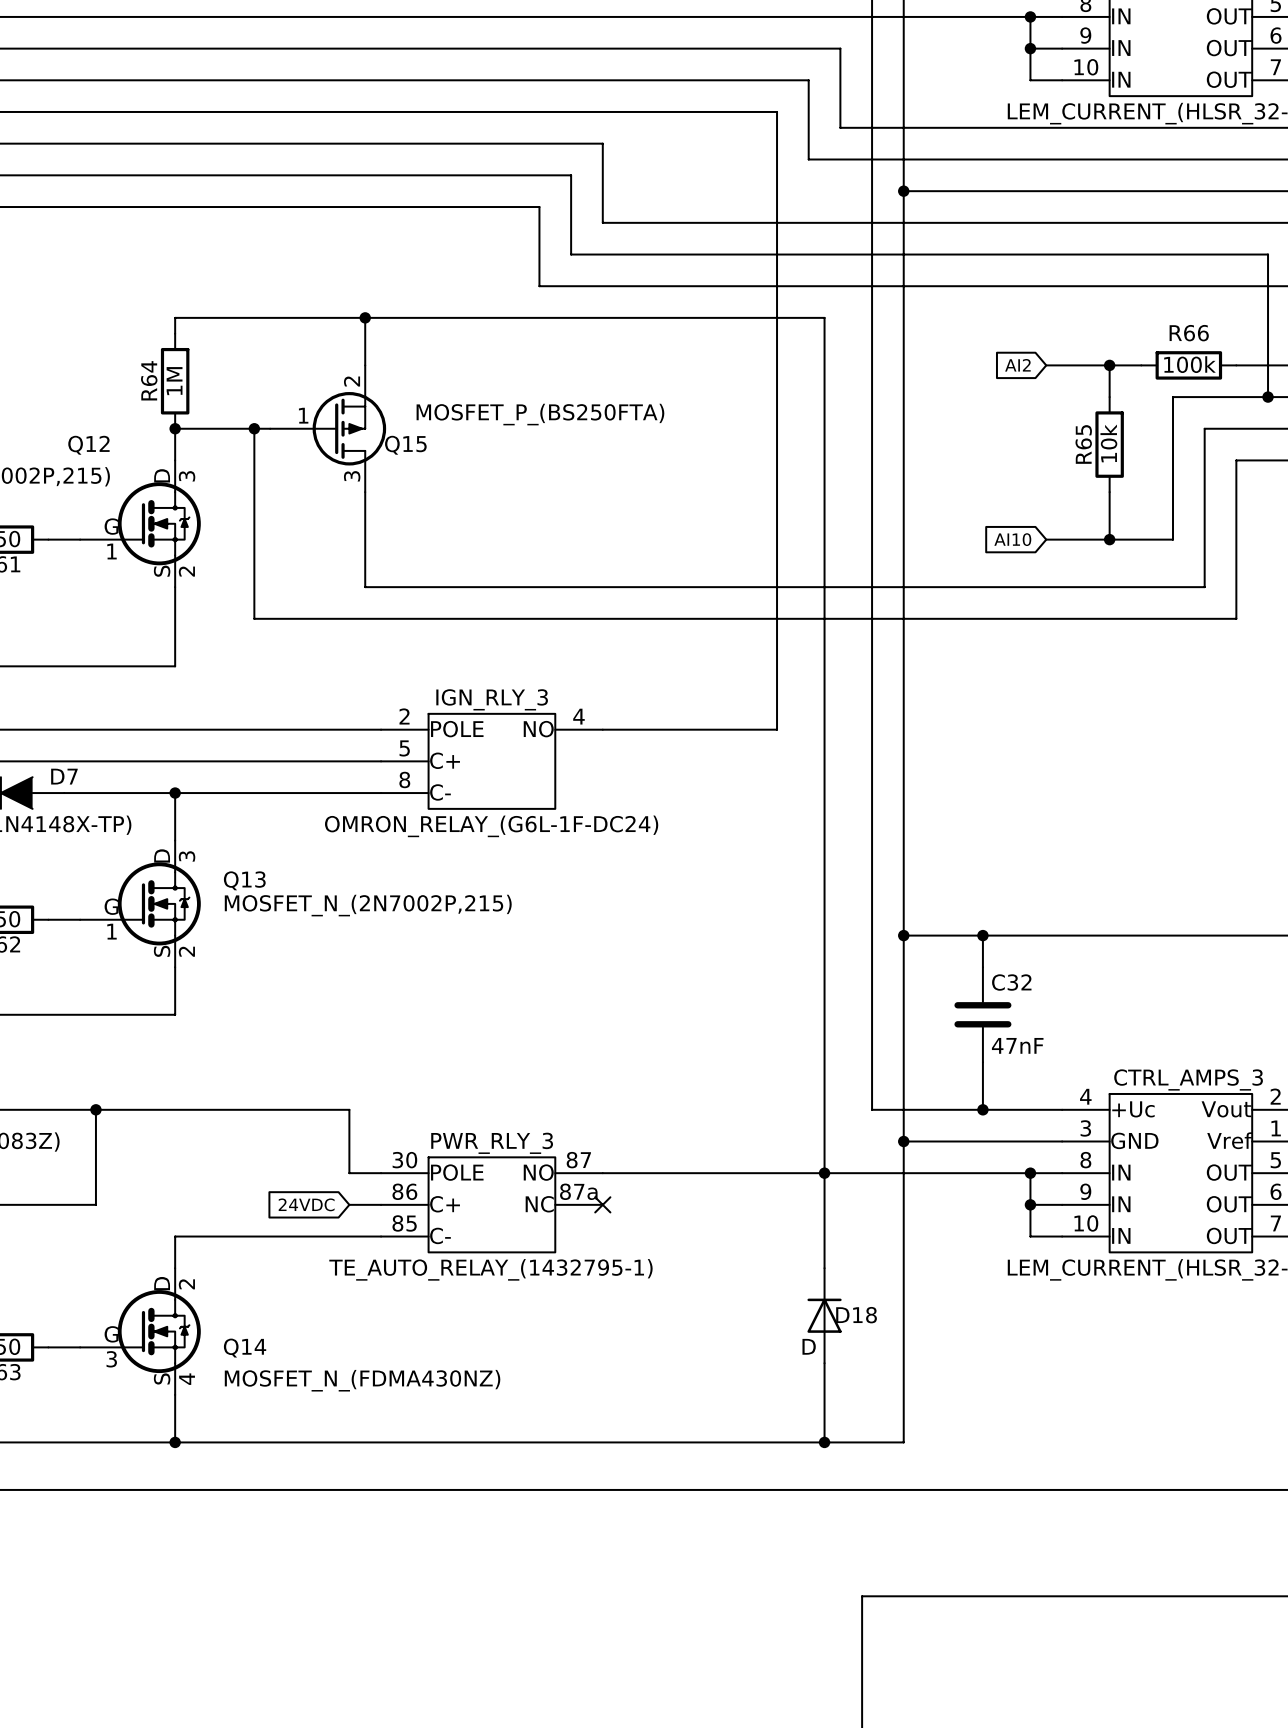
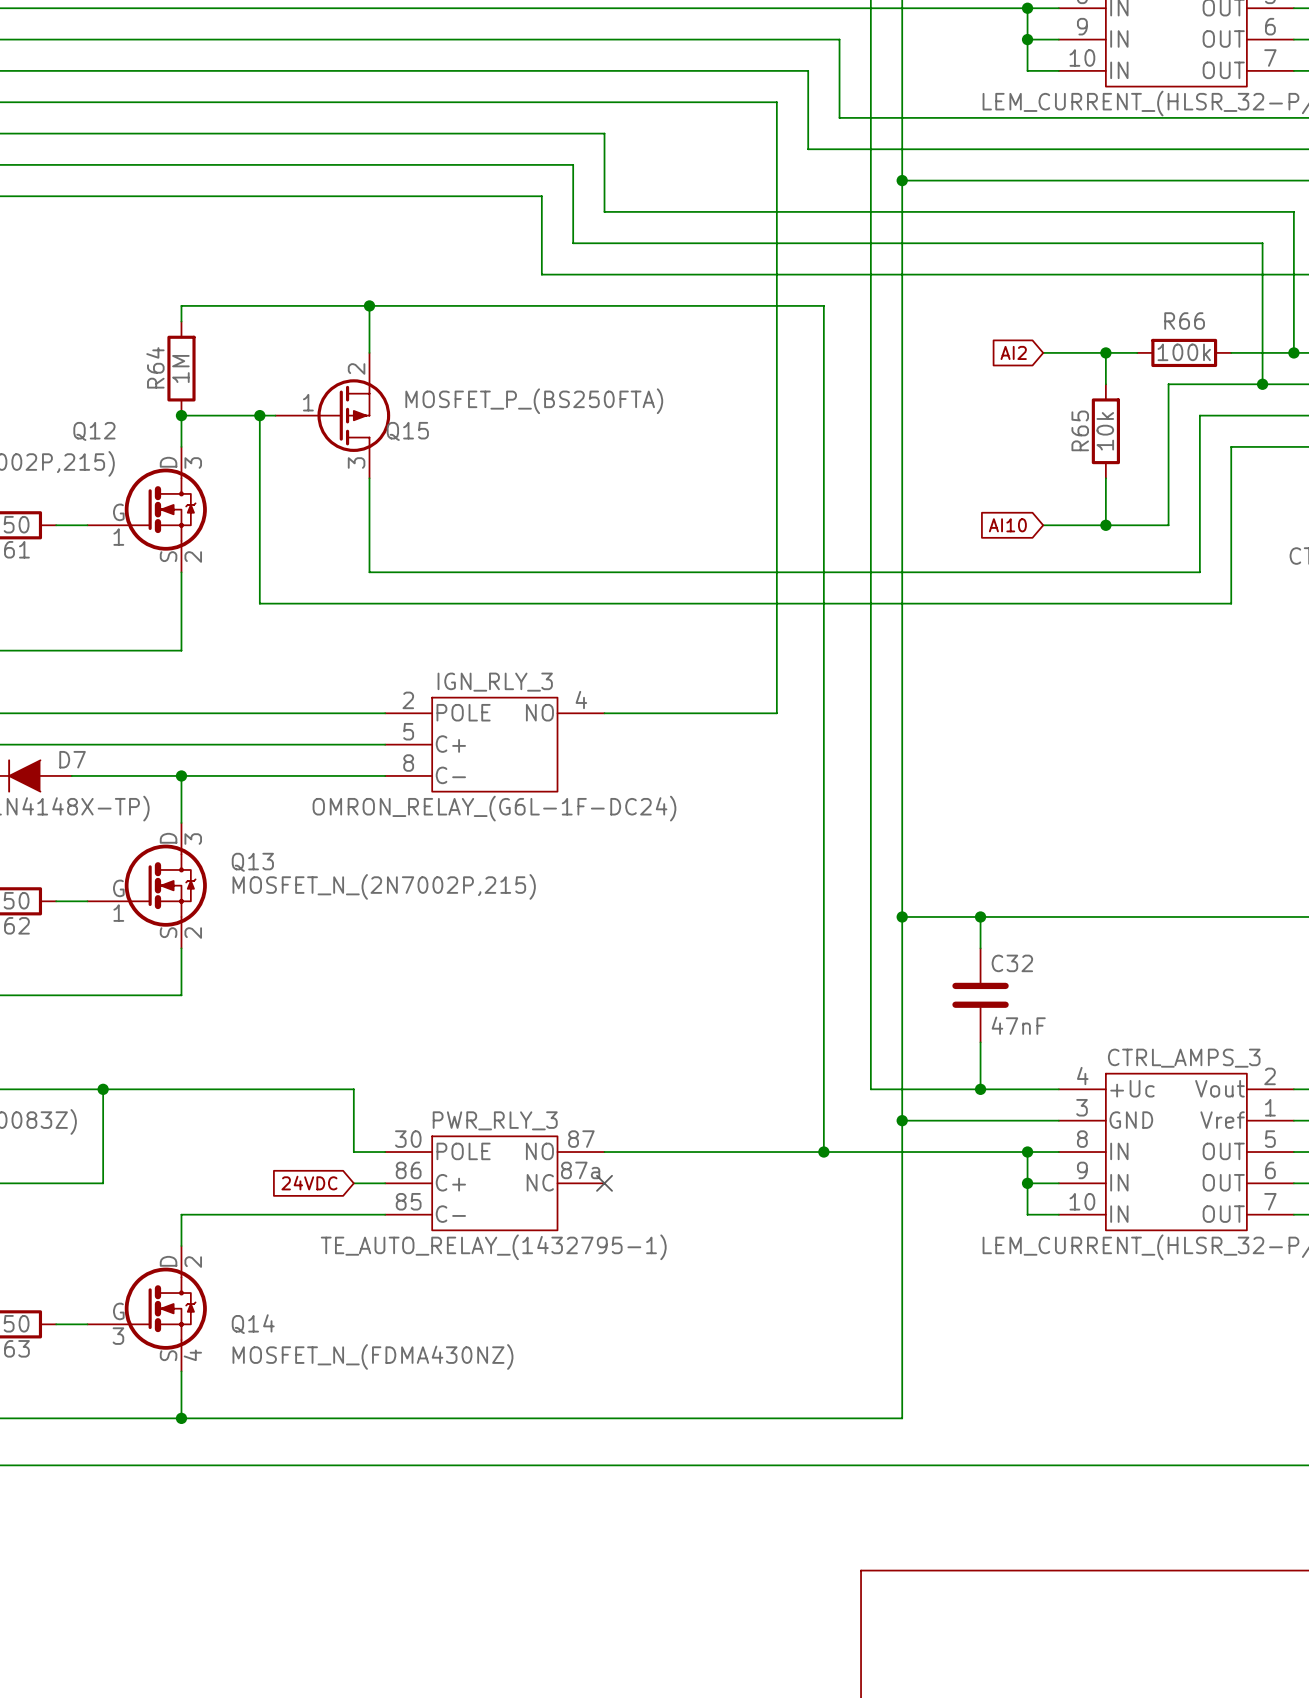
wire: (824, 1173) (824, 1268) -> none
D18: D (824, 1315) -> none
wire: (824, 1363) (824, 1442) -> none
junction: (824, 1442) -> none

